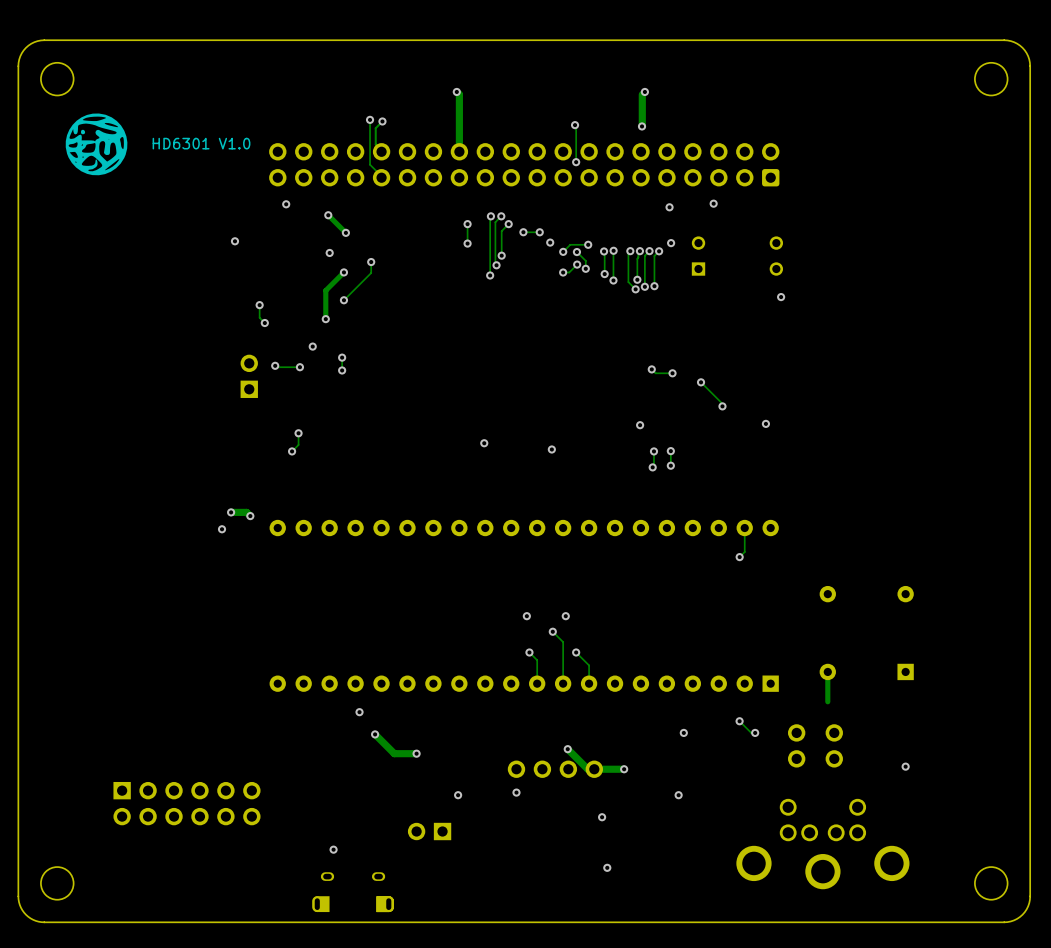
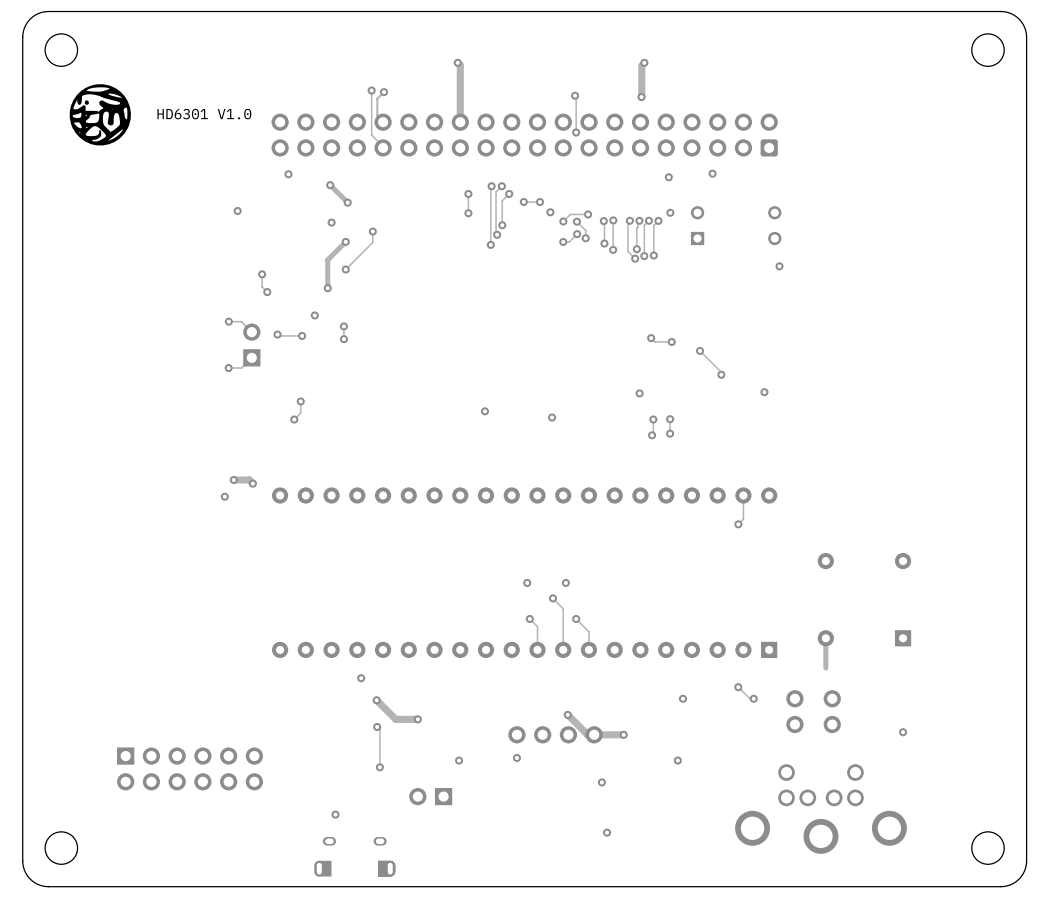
track: none -> (228, 321) (241, 321) (251, 332)
via: none -> (228, 321)
track: none -> (251, 357) (241, 368) (228, 368)
via: none -> (228, 368)
track: none -> (377, 727) (379, 729) (379, 767)
via: none -> (377, 727)
via: none -> (379, 767)

